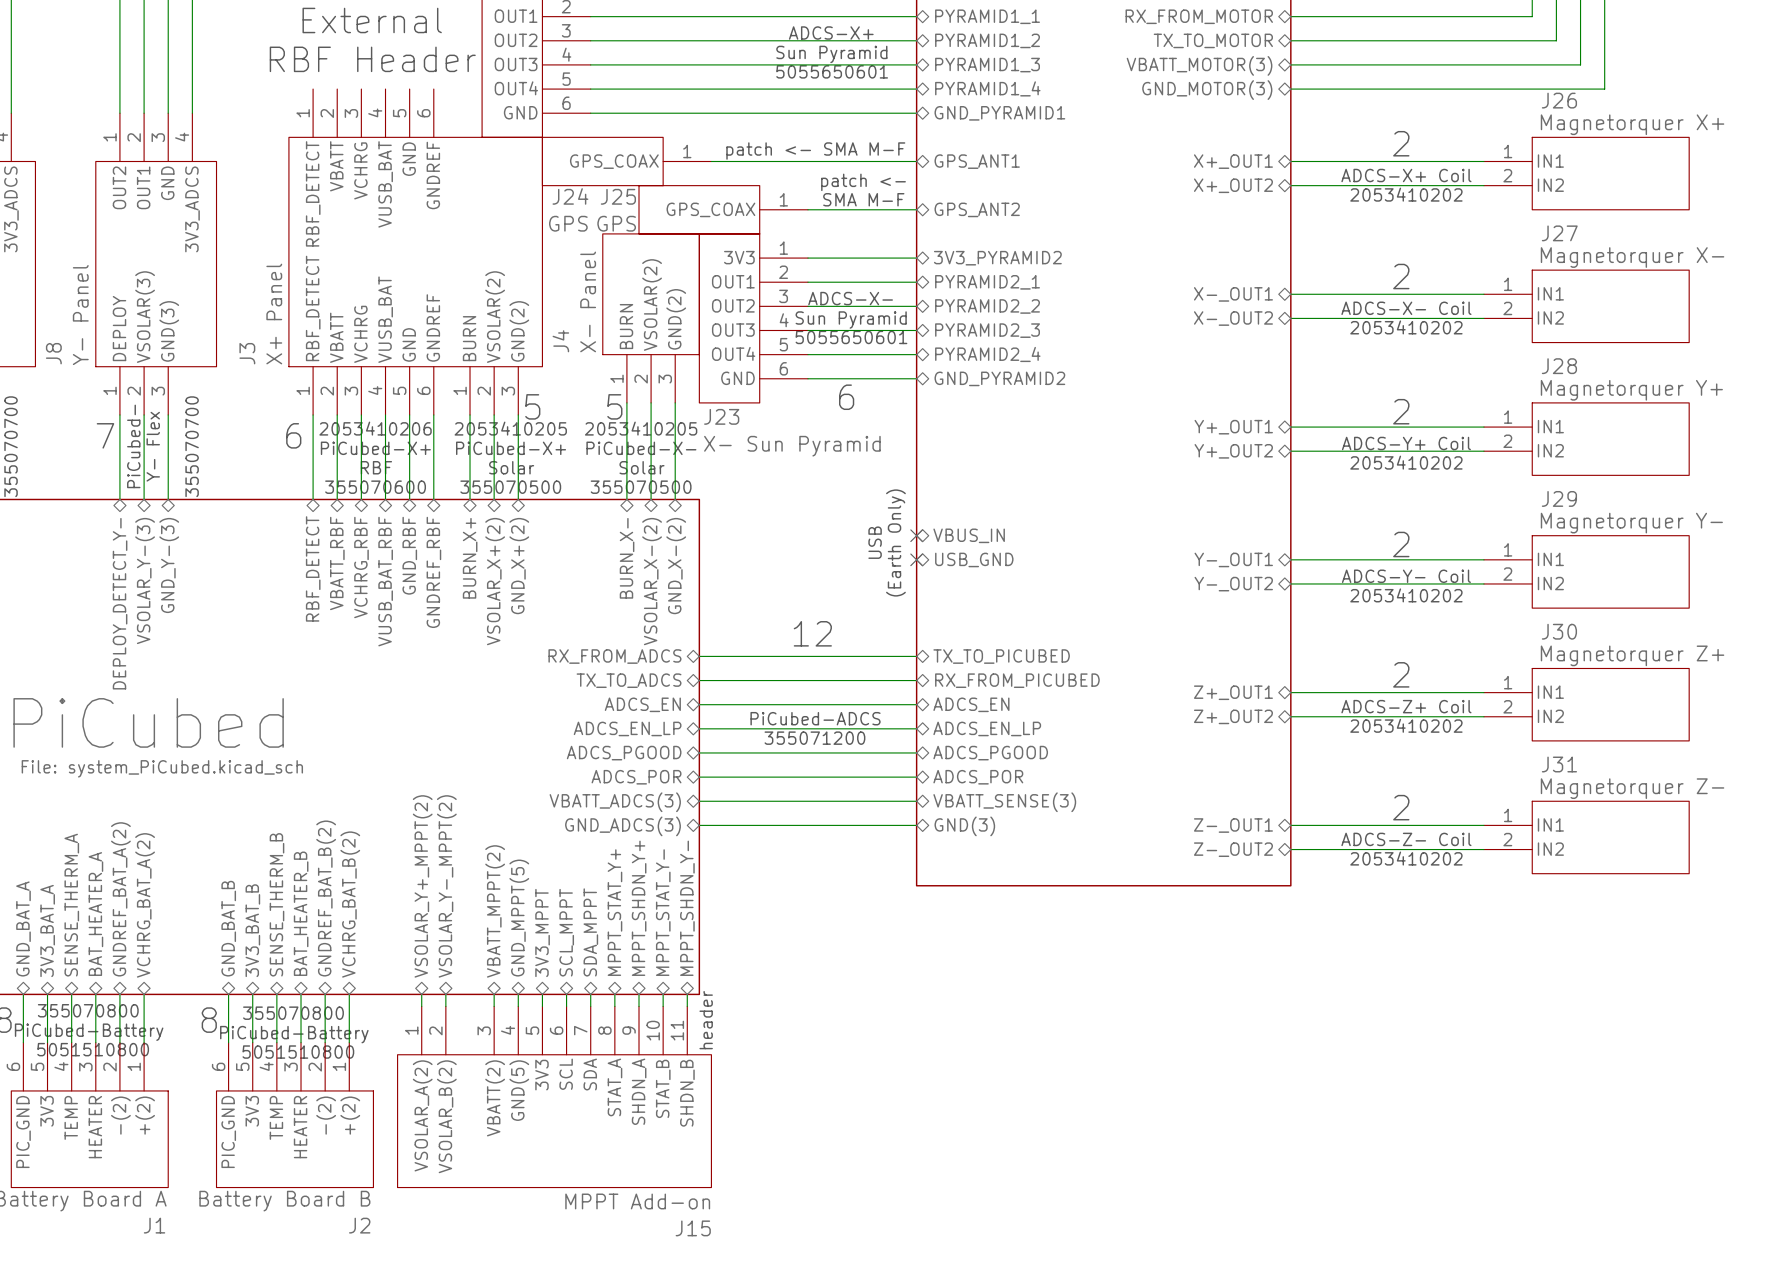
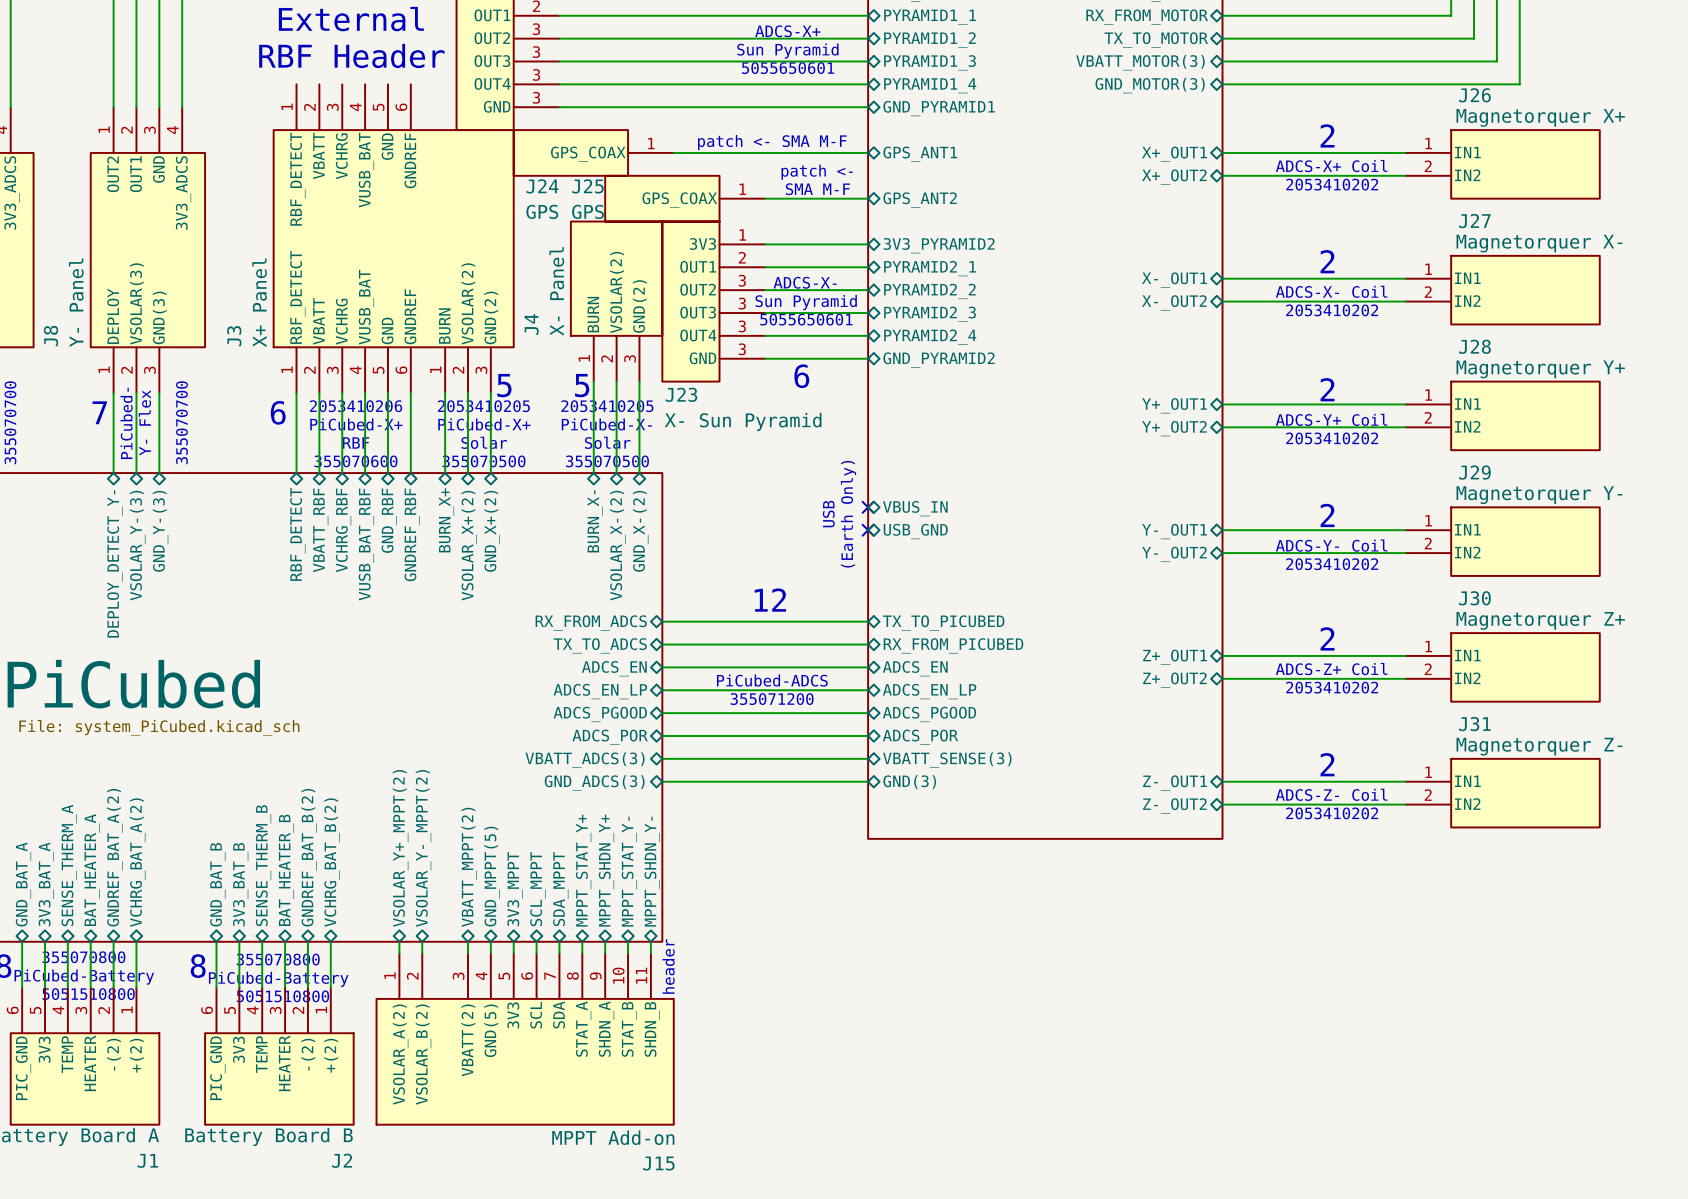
part pin number: 4 (566, 54) -> 3 (536, 52)
part pin number: 5 (566, 79) -> 3 (536, 74)
part pin number: 6 (566, 103) -> 3 (536, 97)
J23 pin number: 4 (784, 320) -> 3 (742, 303)
J23 pin number: 5 (783, 344) -> 3 (742, 326)
J23 pin number: 6 (783, 368) -> 3 (742, 349)

